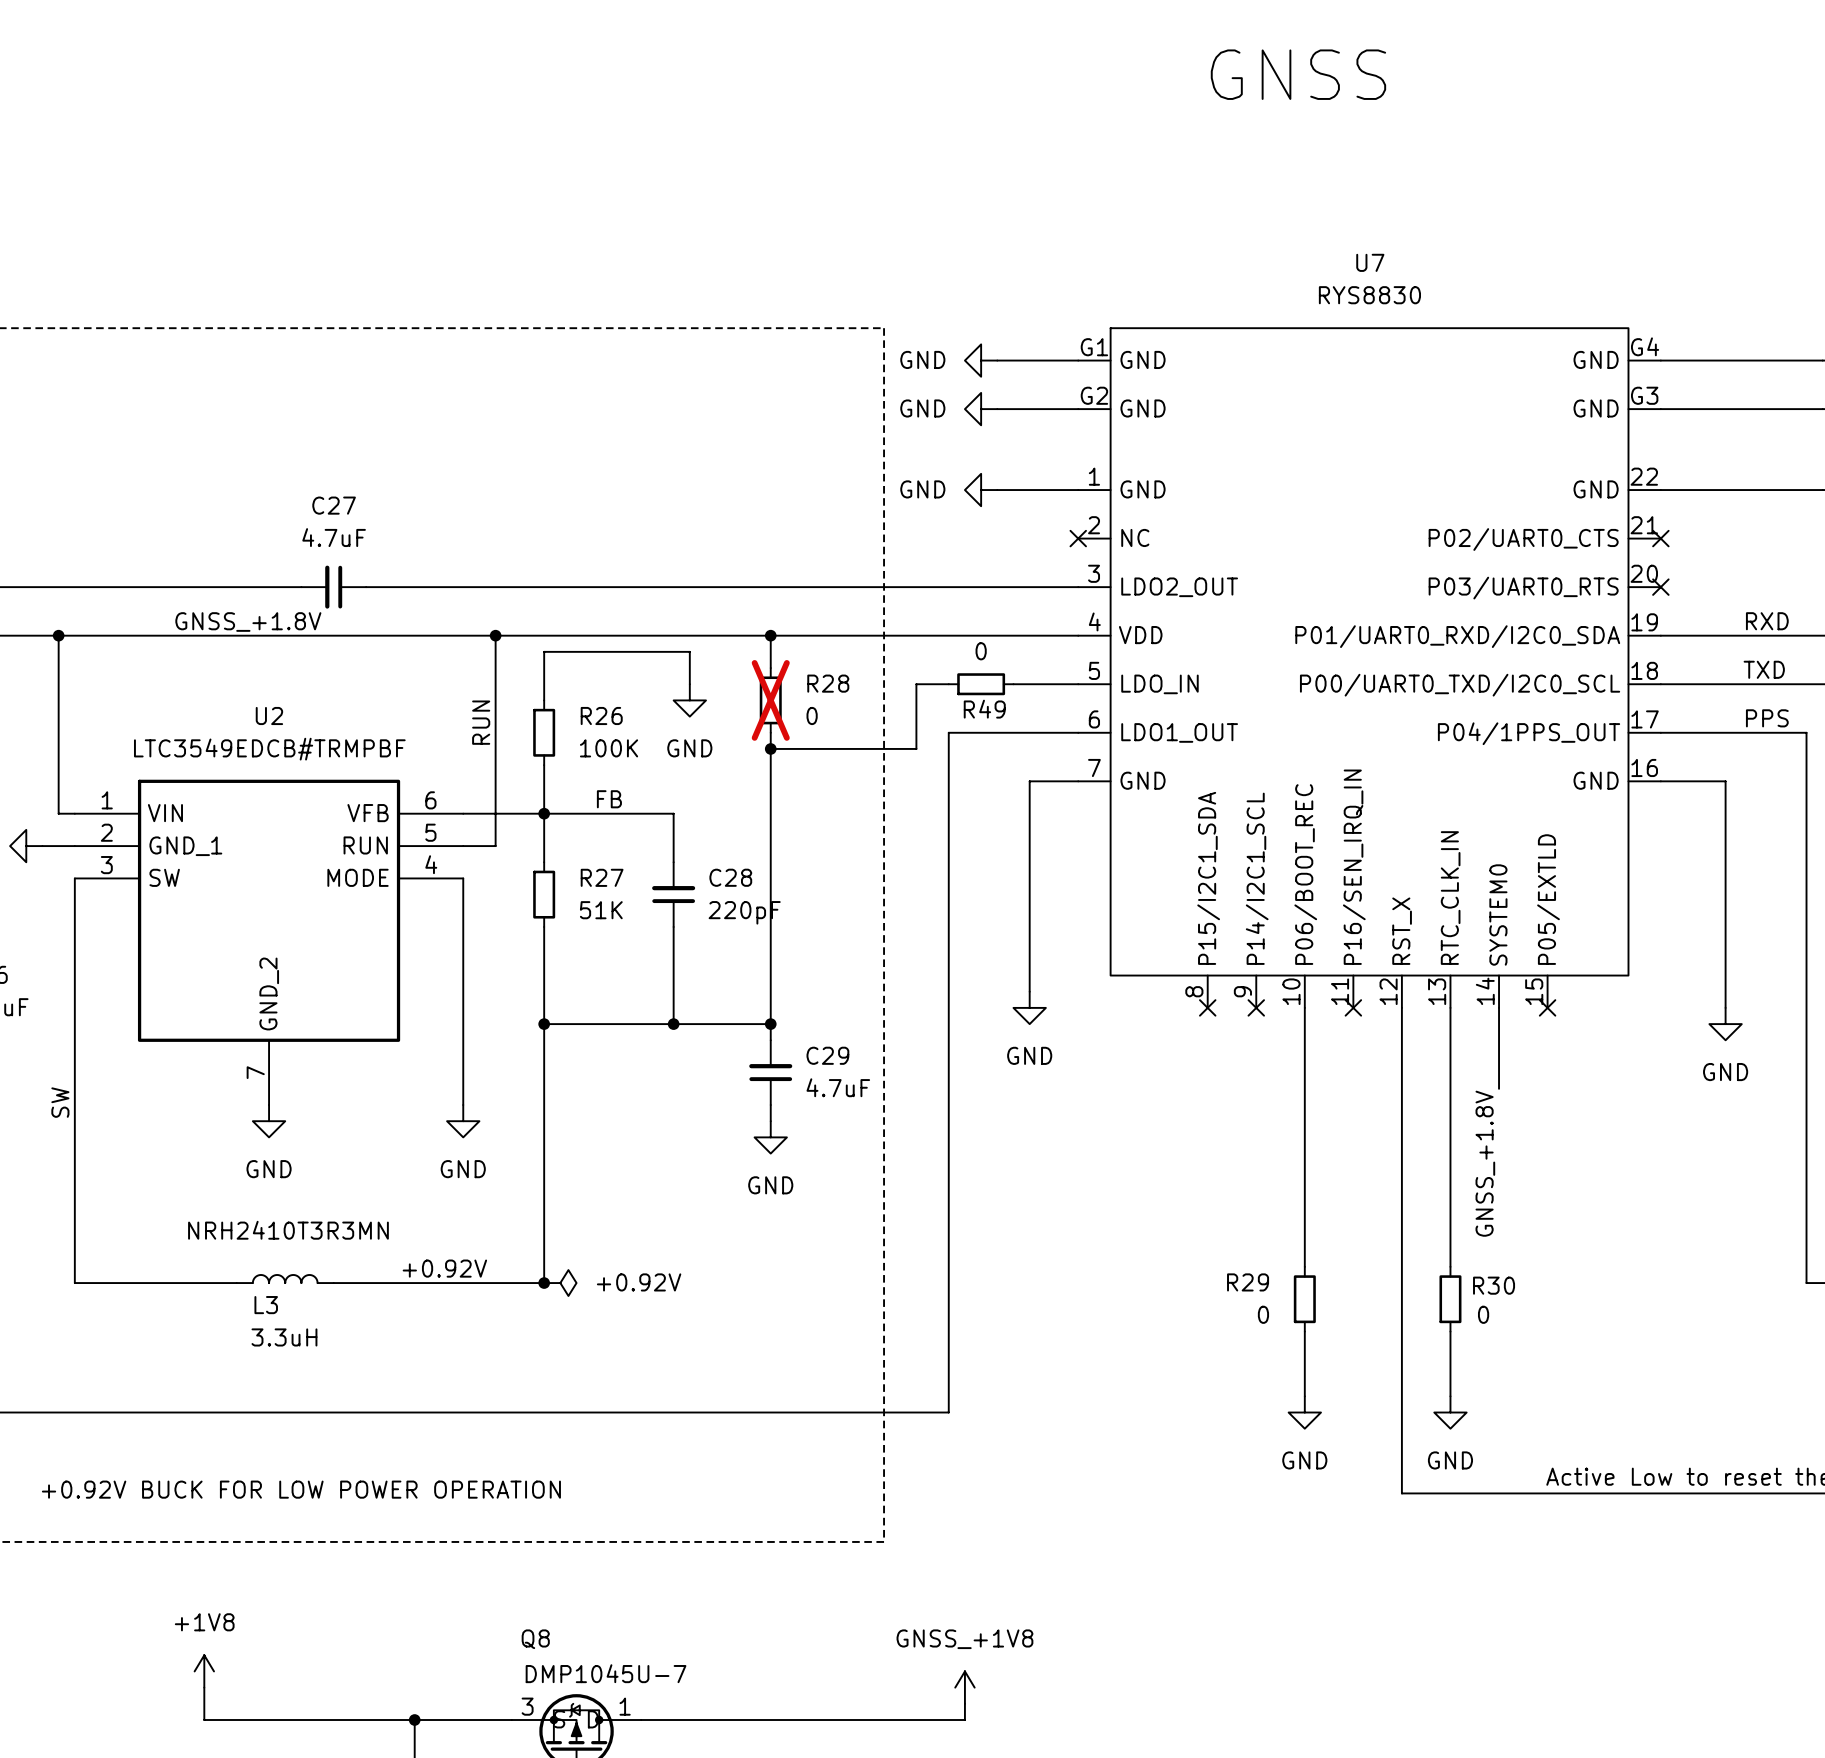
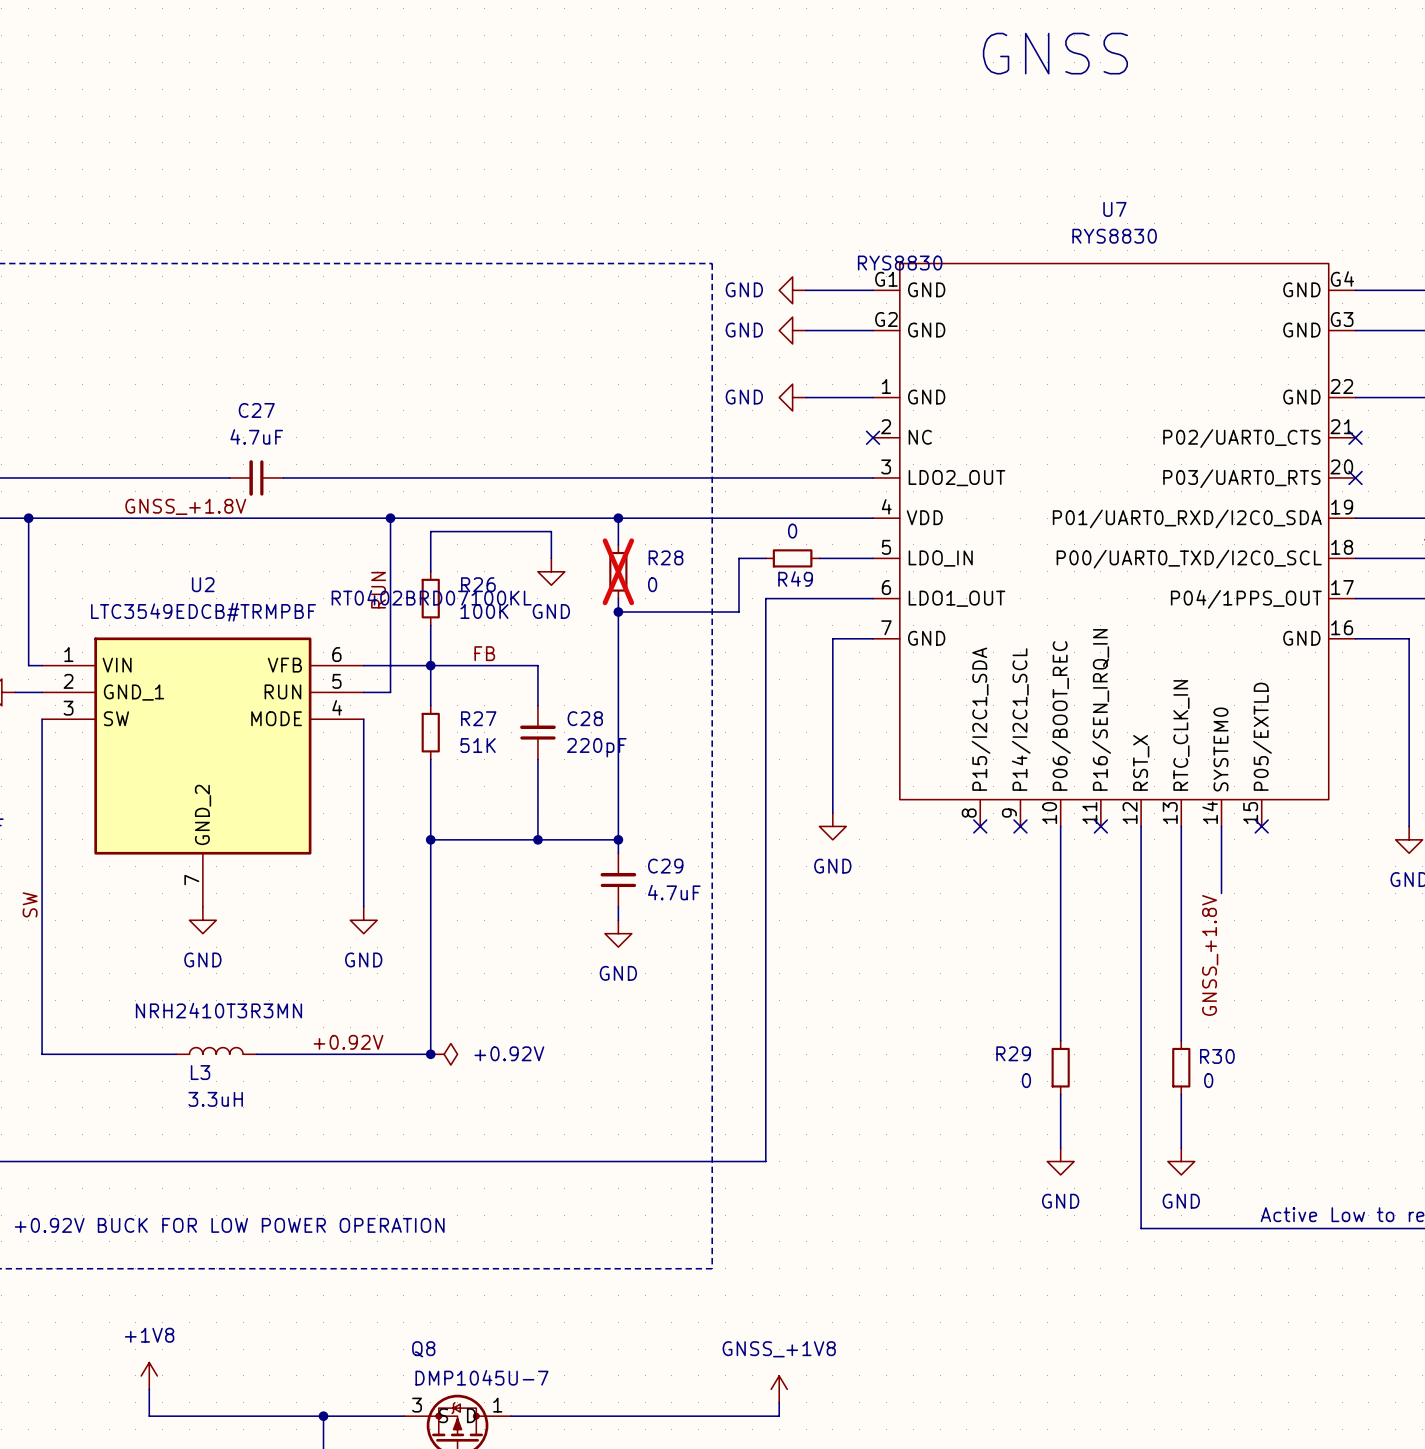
U7 text: none -> RYS8830 (900, 263)
R26 text: none -> RT0402BRD07100KL (431, 597)

